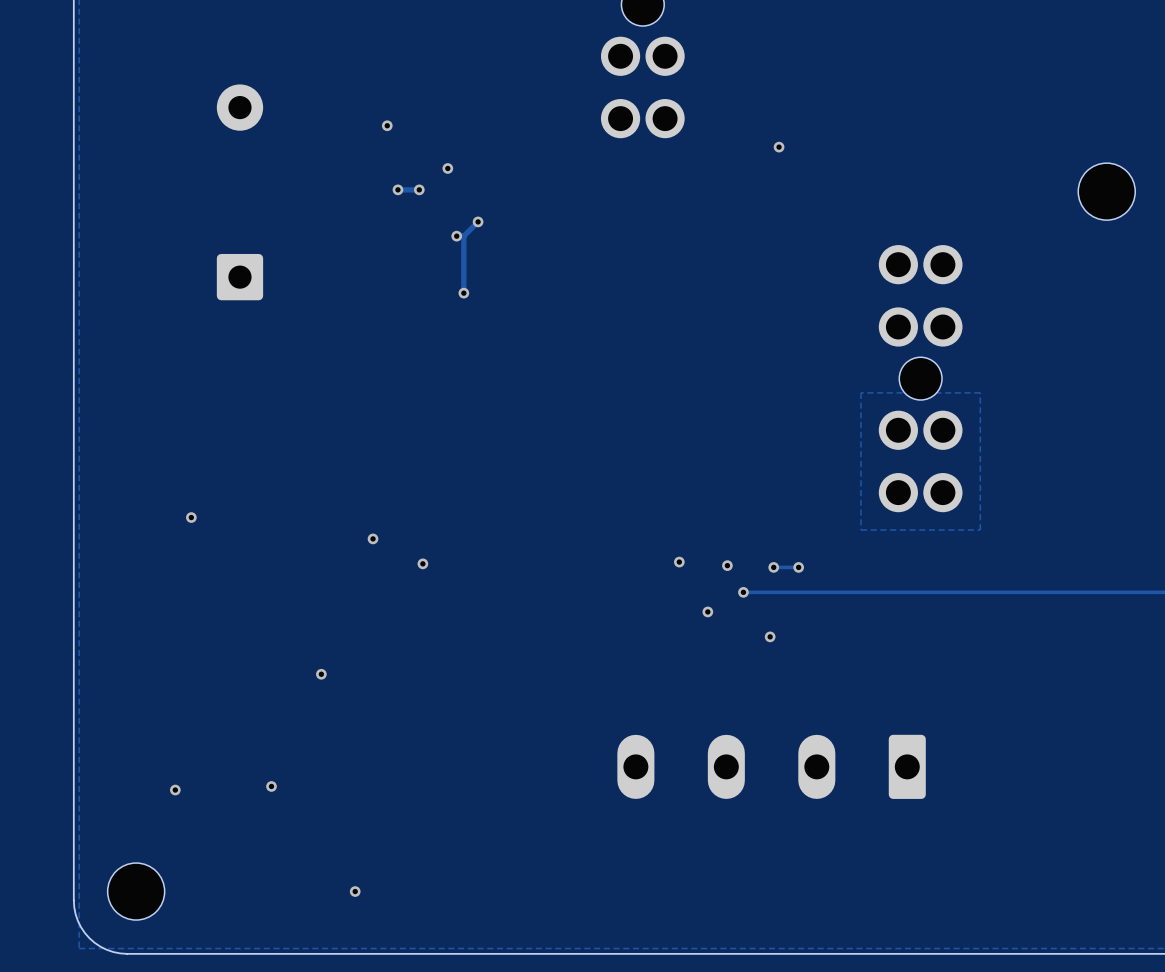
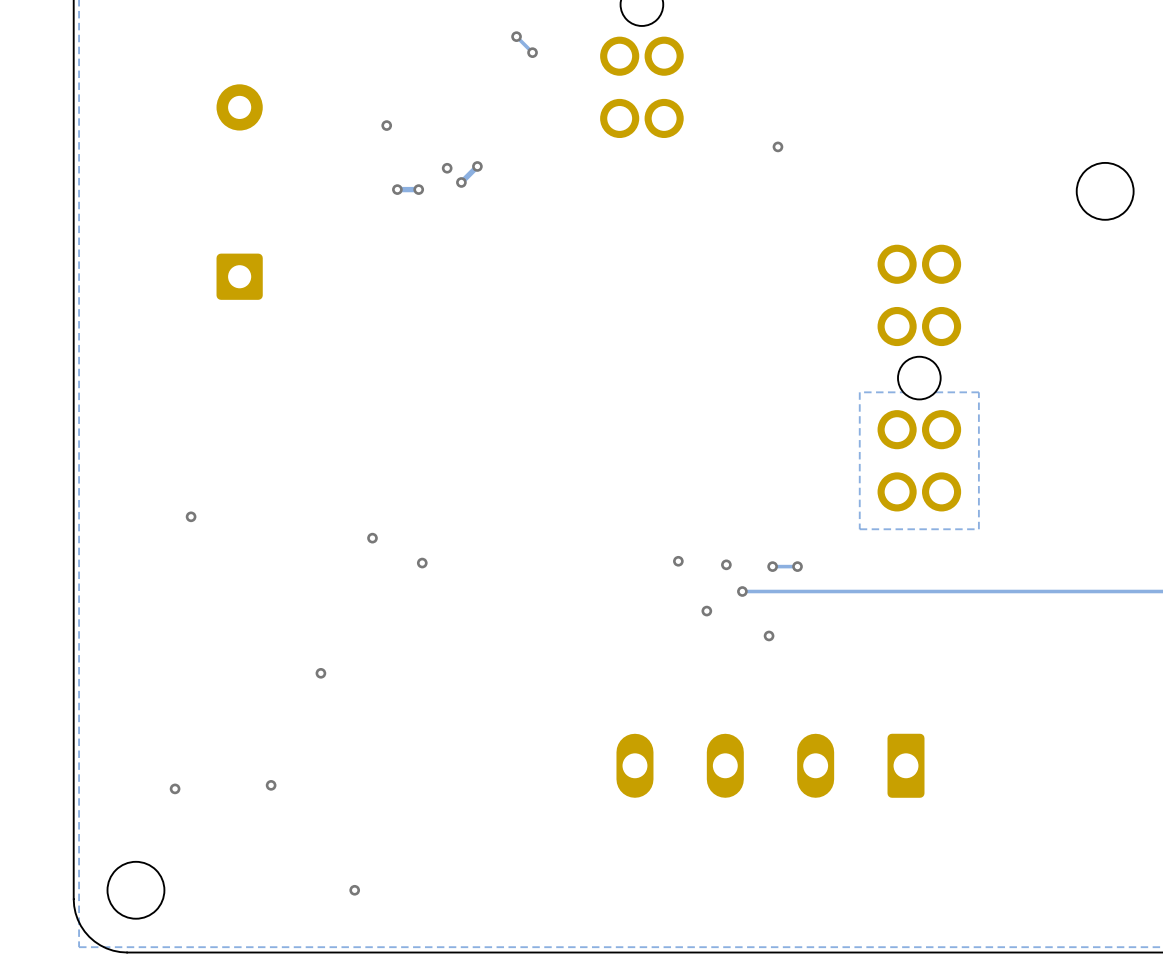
track: none -> (516, 36) (532, 52)
via: none -> (516, 36)
via: none -> (532, 52)
track: none -> (477, 166) (461, 182)
via: none -> (477, 166)
via: none -> (461, 182)
track: (478, 221) (463, 236) -> none
via: (478, 221) -> none
via: (456, 236) -> none
track: (463, 236) (463, 293) -> none
via: (463, 293) -> none

